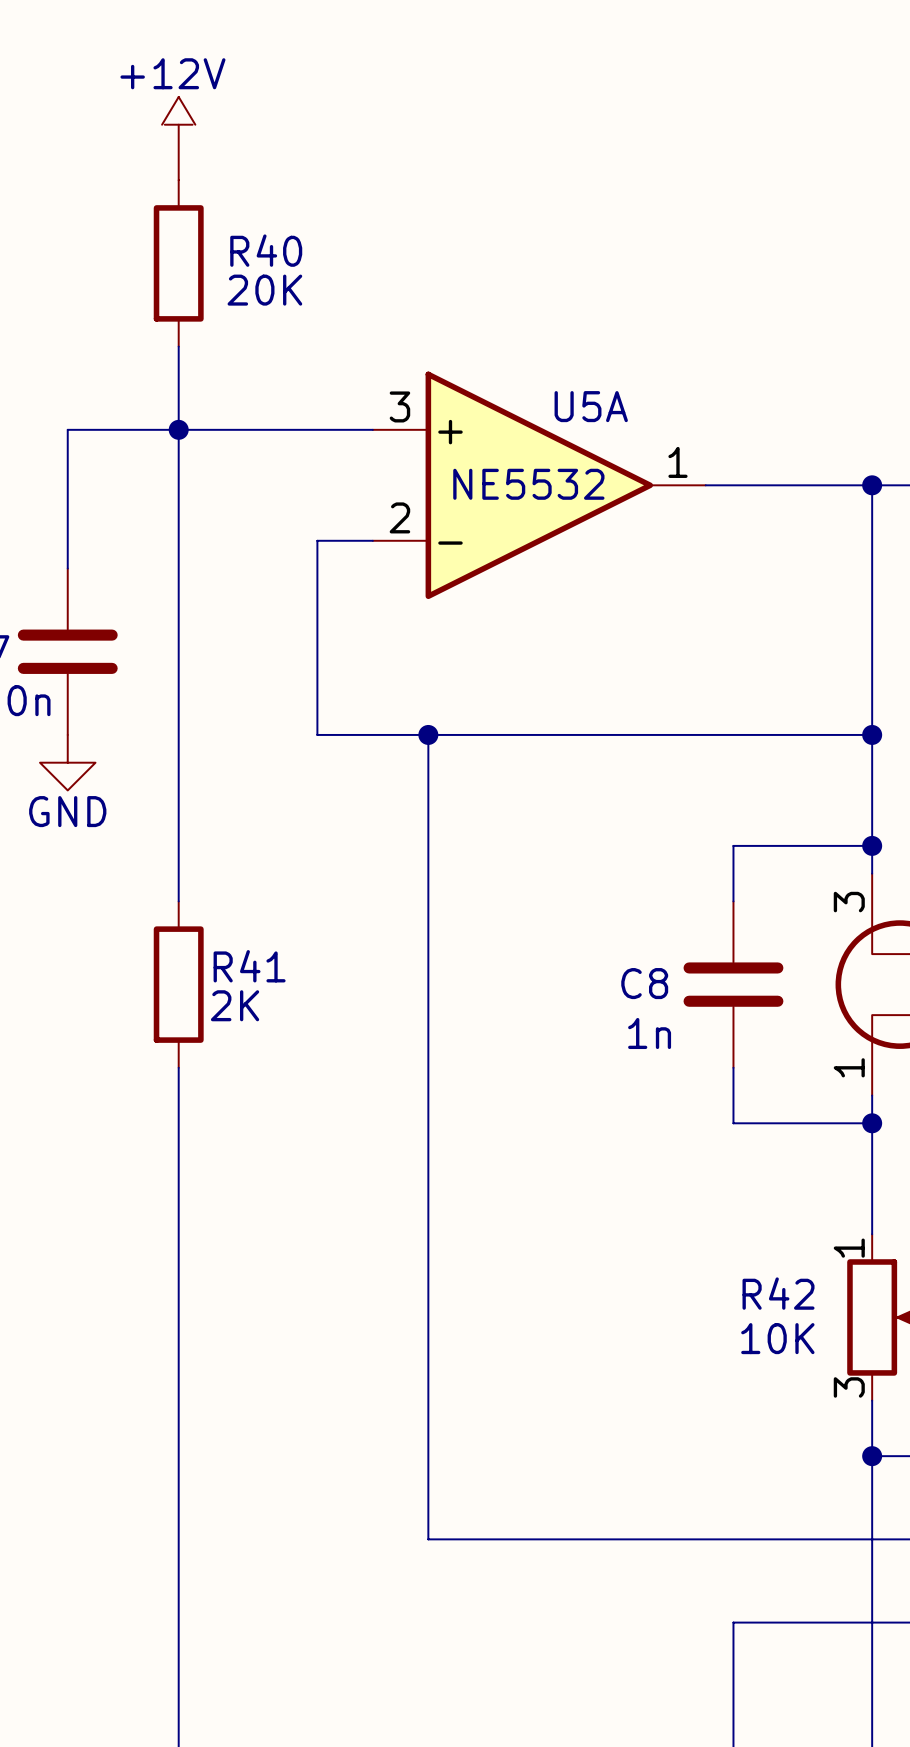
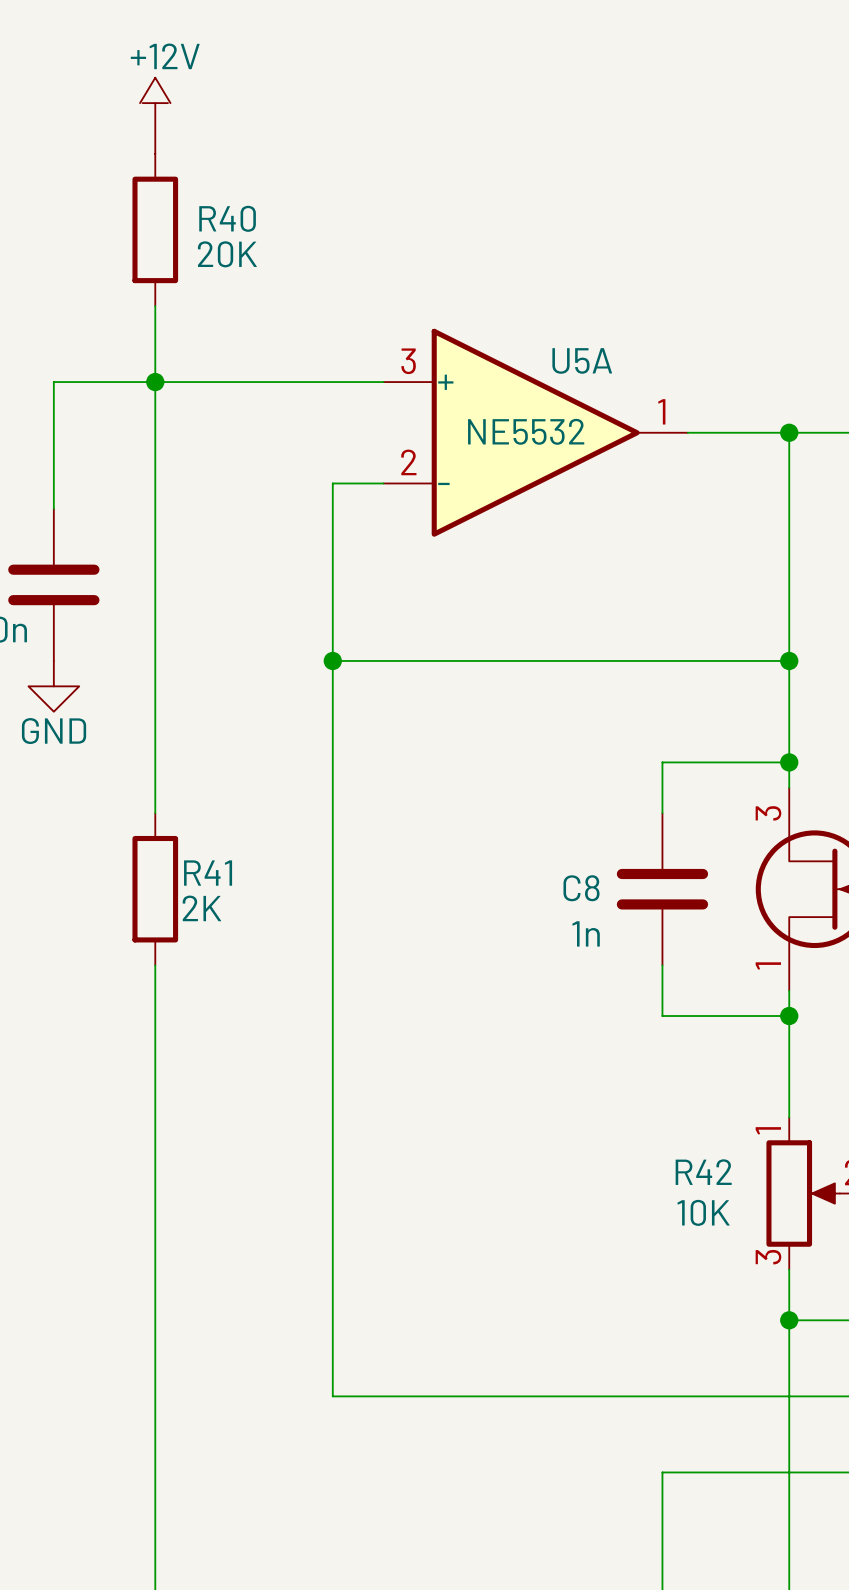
U5A position: (539, 485) -> (535, 432)
wire: (372, 540) (317, 540) (317, 734) (372, 734) -> none
wire: (428, 734) (428, 1539) -> (383, 483) (332, 483) (332, 1396) (383, 1396)
junction position: (428, 734) -> (332, 660)

